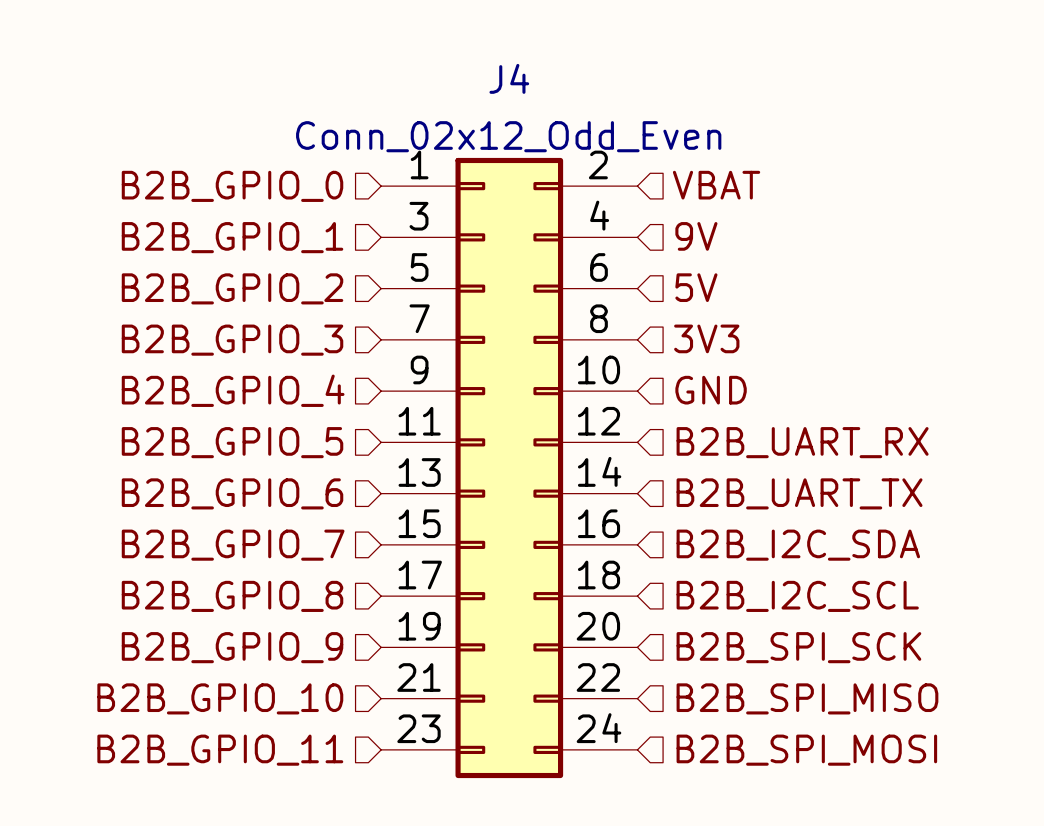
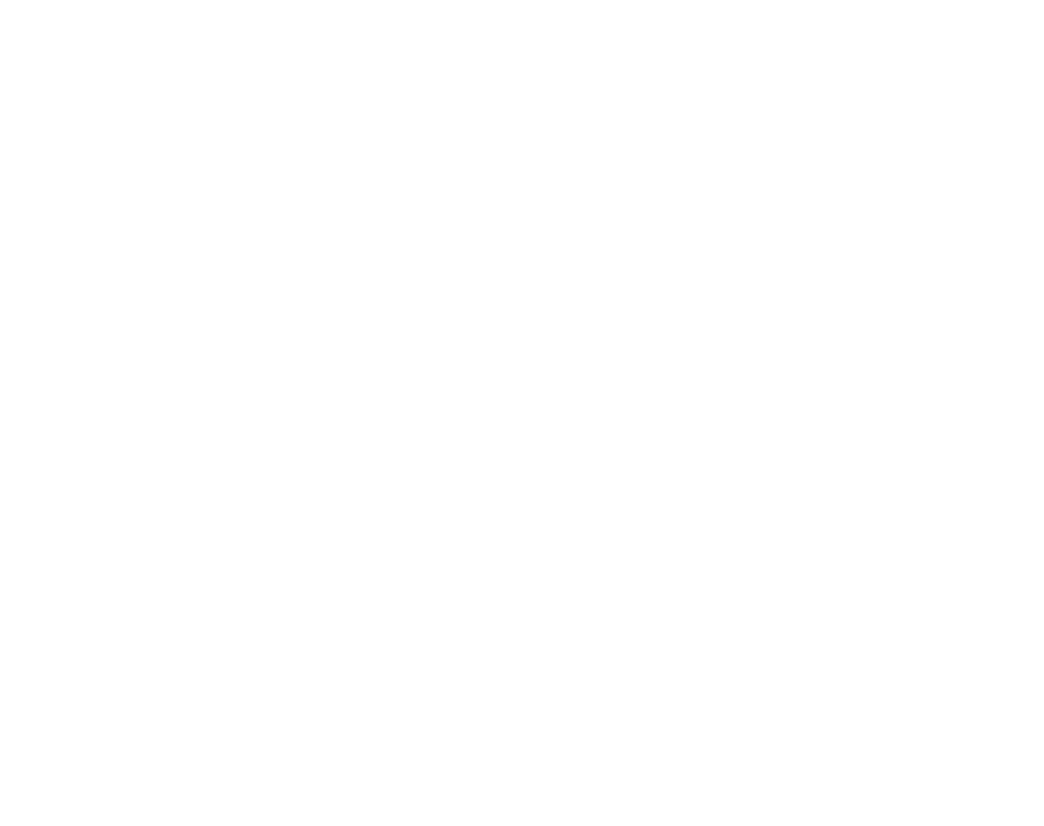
hierarchical label: VBAT (716, 185) -> none
hierarchical label: B2B_GPIO_0 (232, 186) -> none
hierarchical label: 9V (696, 236) -> none
hierarchical label: B2B_GPIO_1 (232, 237) -> none
hierarchical label: 5V (696, 287) -> none
hierarchical label: B2B_GPIO_2 (232, 288) -> none
hierarchical label: 3V3 (706, 338) -> none
hierarchical label: B2B_GPIO_3 (232, 340) -> none
hierarchical label: B2B_GPIO_4 (233, 390) -> none
hierarchical label: GND (711, 390) -> none
hierarchical label: B2B_GPIO_5 (232, 442) -> none
hierarchical label: B2B_UART_RX (802, 442) -> none
J4: Conn_02x12_Odd_Even (509, 468) -> none
hierarchical label: B2B_GPIO_6 (232, 493) -> none
hierarchical label: B2B_UART_TX (799, 493) -> none
hierarchical label: B2B_GPIO_7 (233, 545) -> none
hierarchical label: B2B_I2C_SDA (798, 545) -> none
hierarchical label: B2B_GPIO_8 (232, 596) -> none
hierarchical label: B2B_I2C_SCL (797, 596) -> none
hierarchical label: B2B_GPIO_9 (232, 647) -> none
hierarchical label: B2B_SPI_SCK (798, 647) -> none
hierarchical label: B2B_GPIO_10 (220, 698) -> none
hierarchical label: B2B_SPI_MISO (807, 698) -> none
hierarchical label: B2B_GPIO_11 (220, 750) -> none
hierarchical label: B2B_SPI_MOSI (806, 750) -> none

